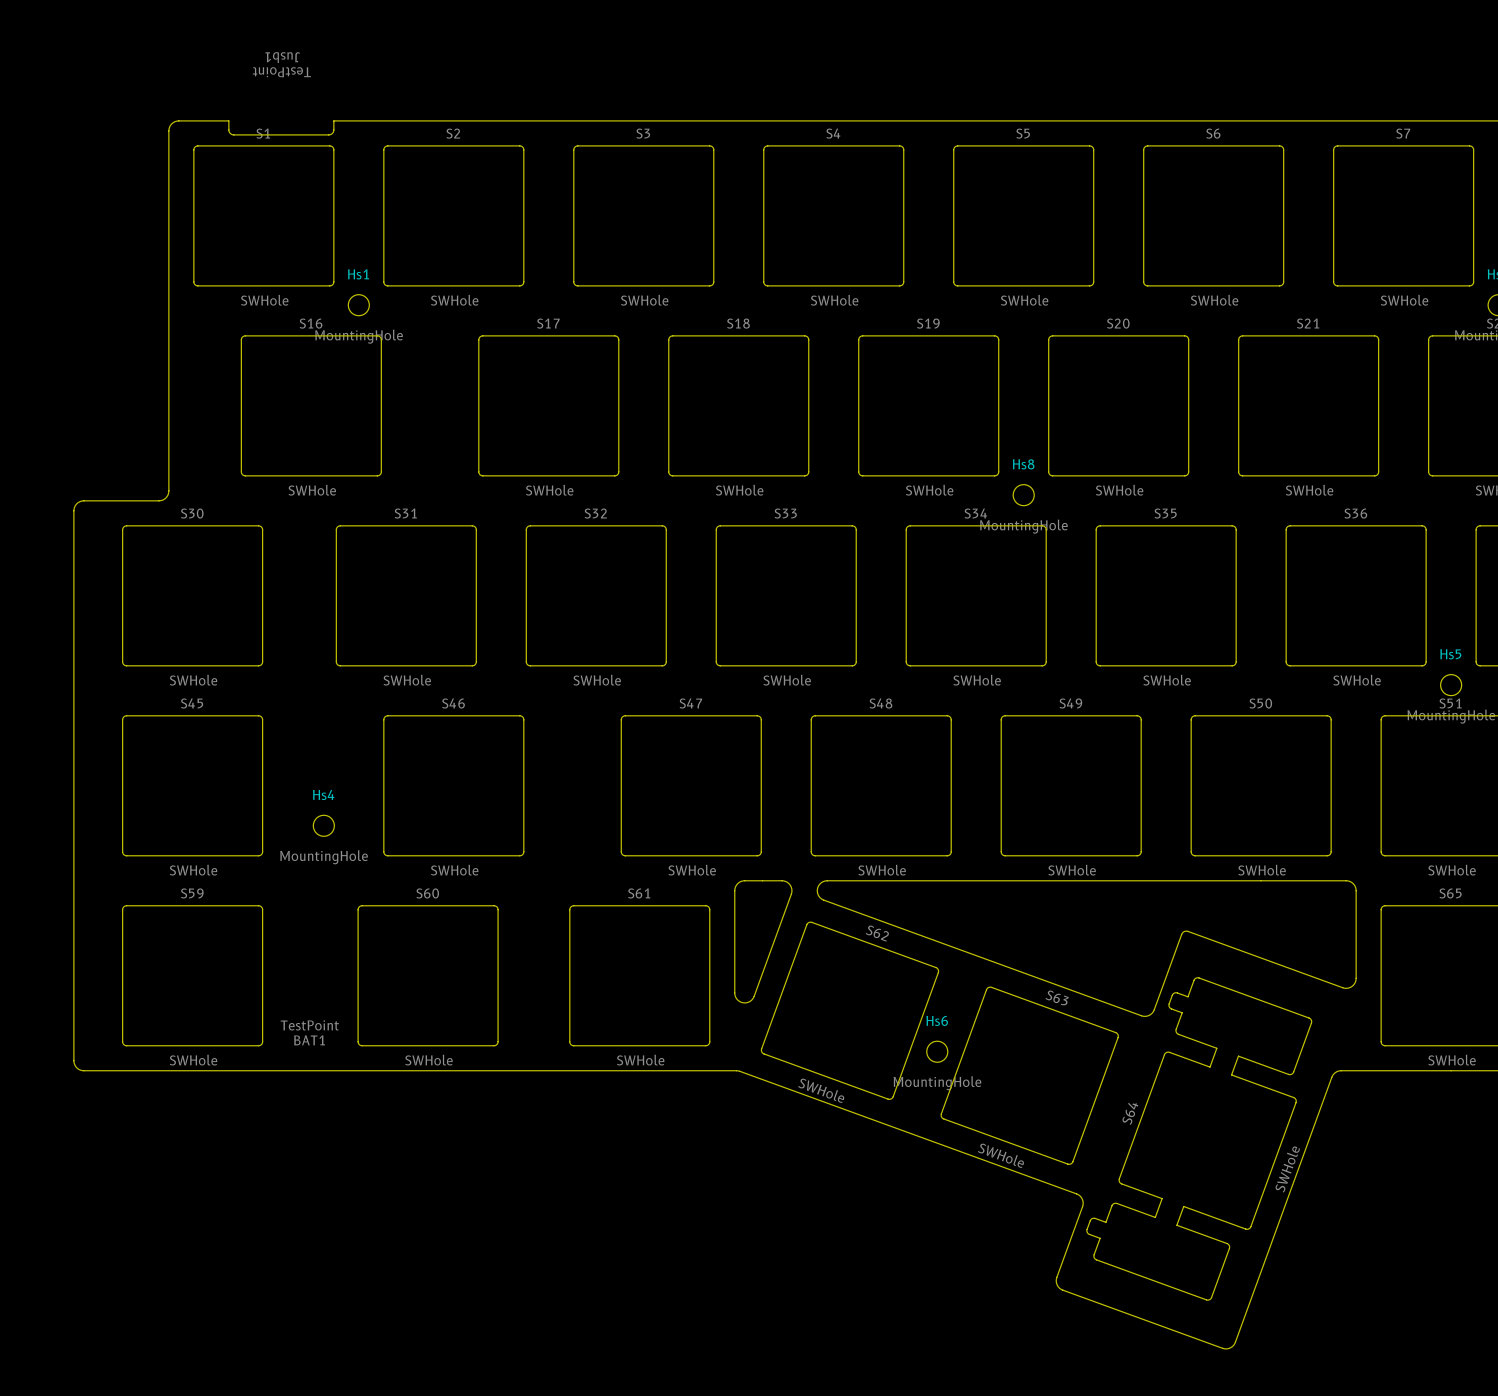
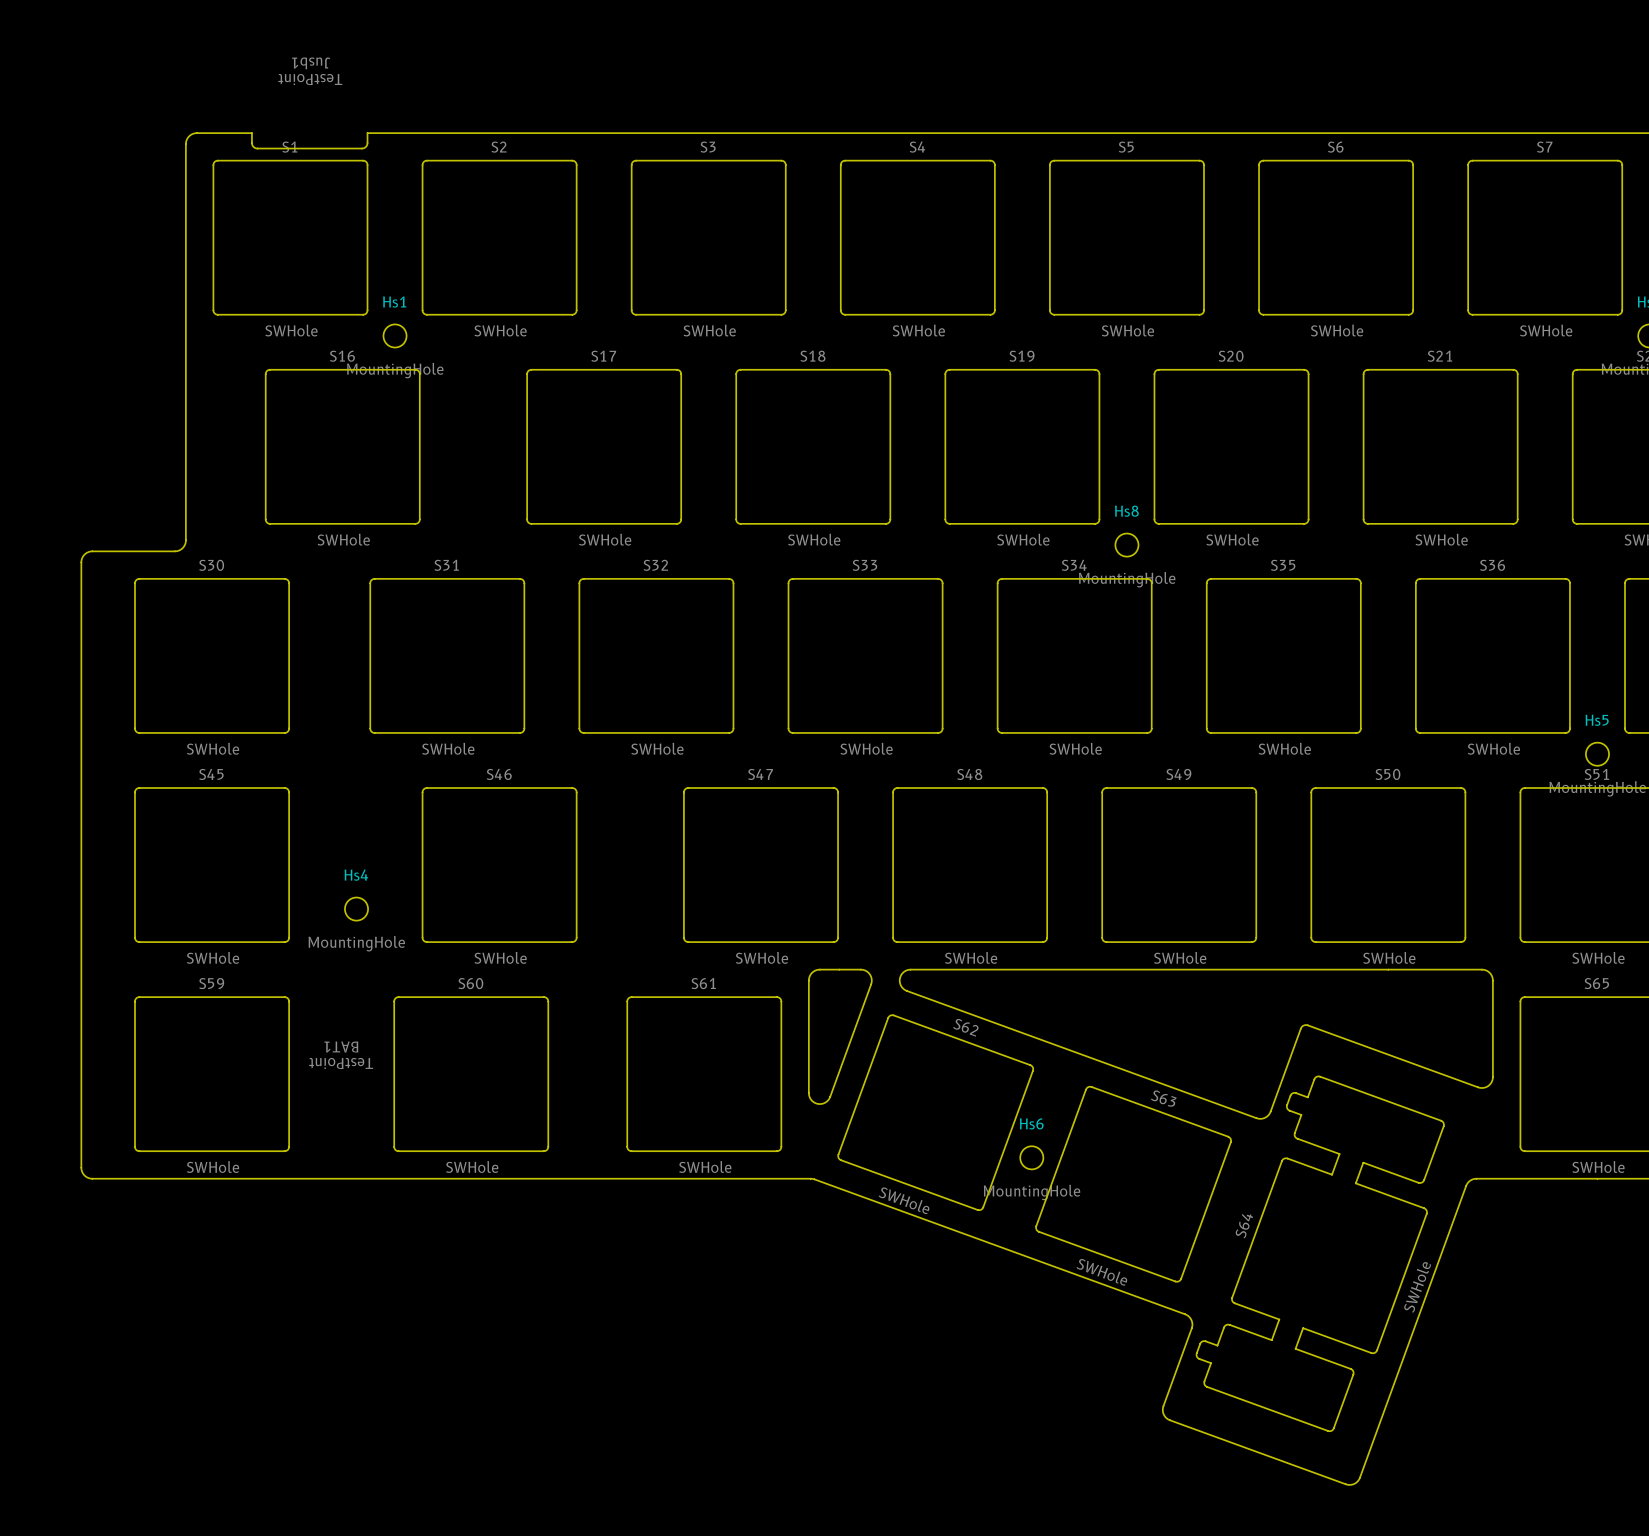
BAT1 value rotation: 0° (309, 1025) -> 180° (341, 1063)
BAT1 position: (309, 1032) -> (341, 1055)
BAT1 name rotation: 0° (309, 1040) -> 180° (341, 1047)

